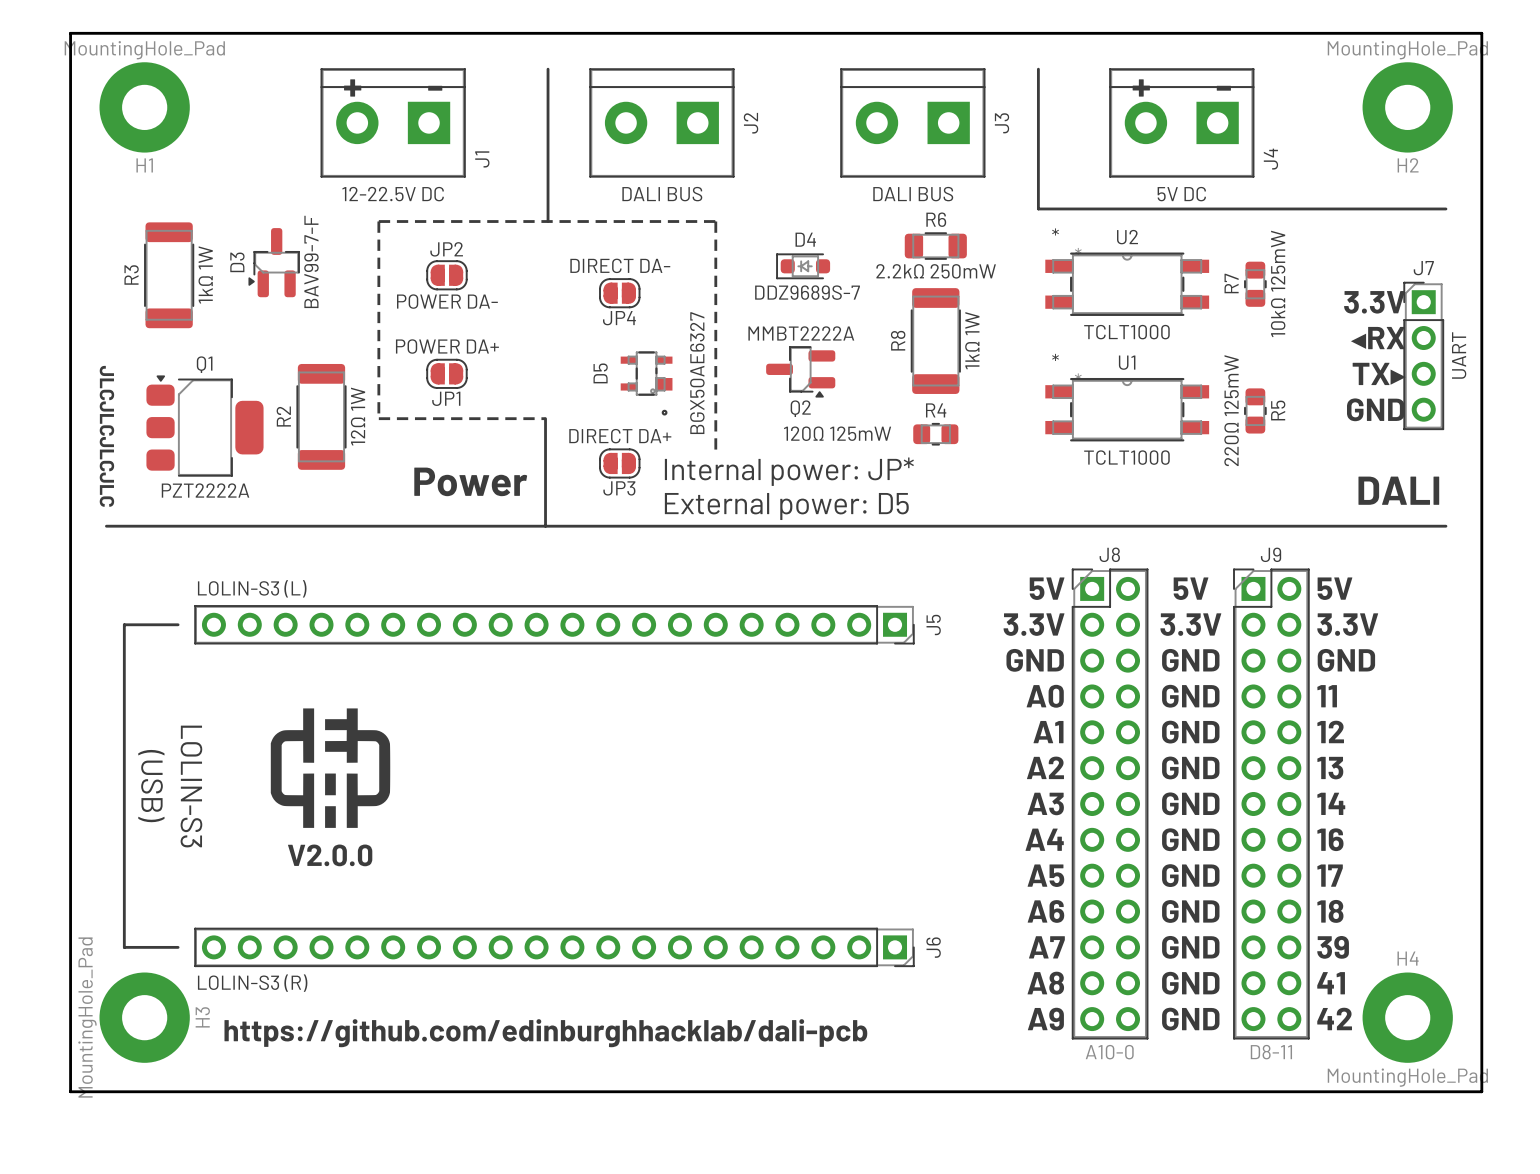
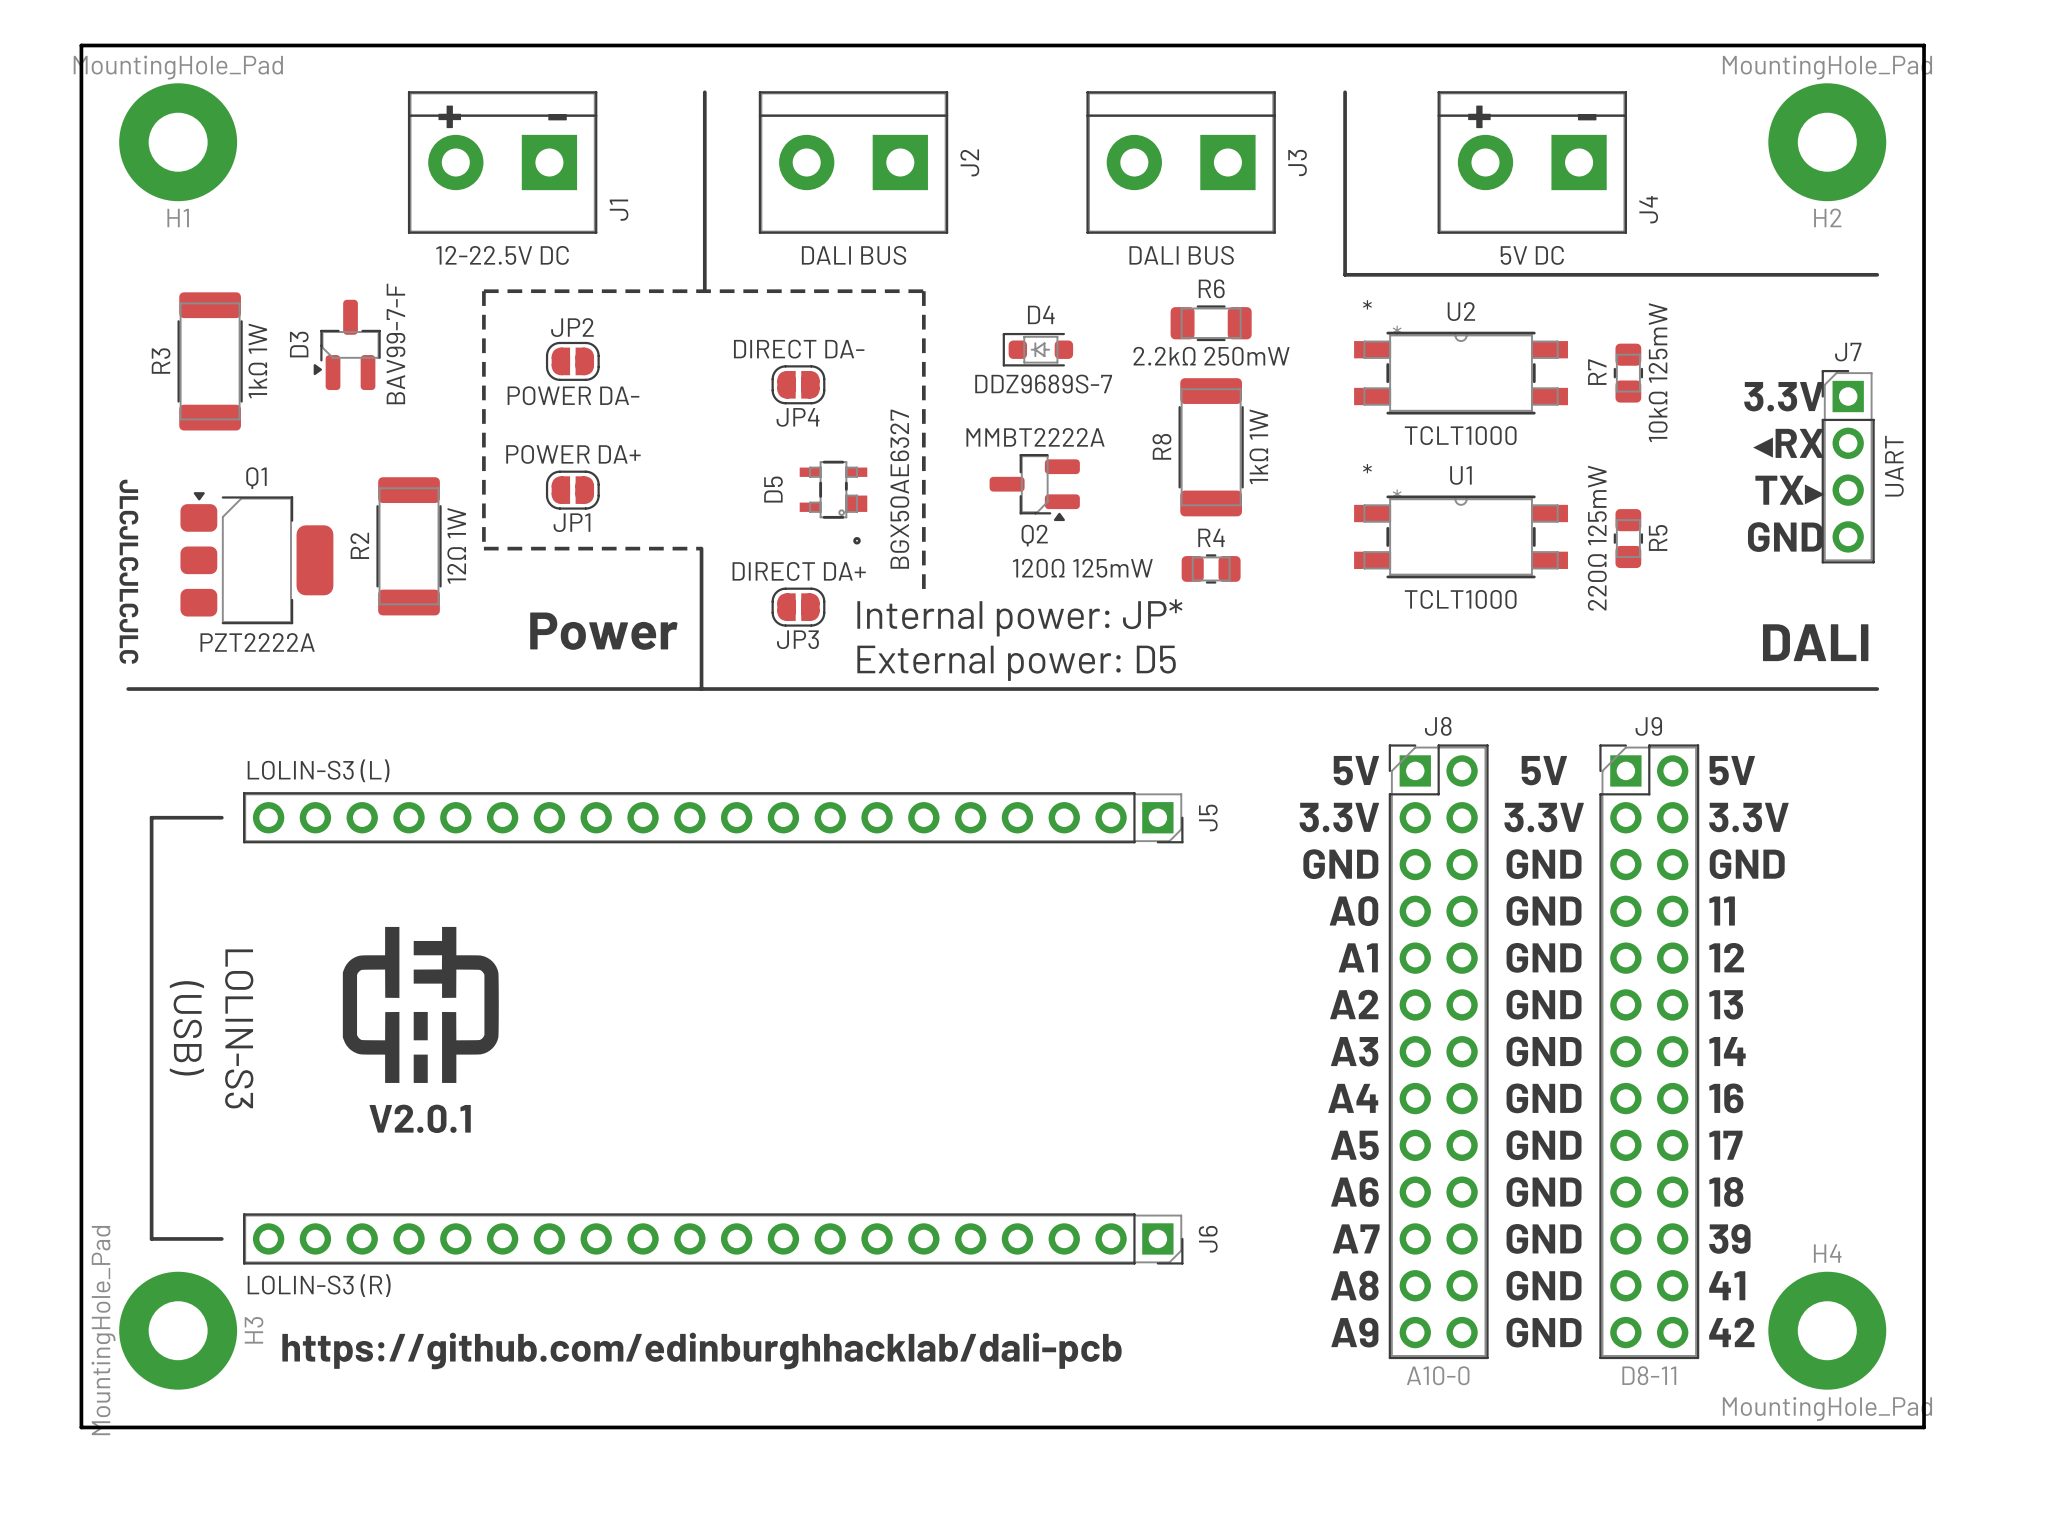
text: V2.0.0 (330, 855) -> V2.0.1 (420, 1118)

